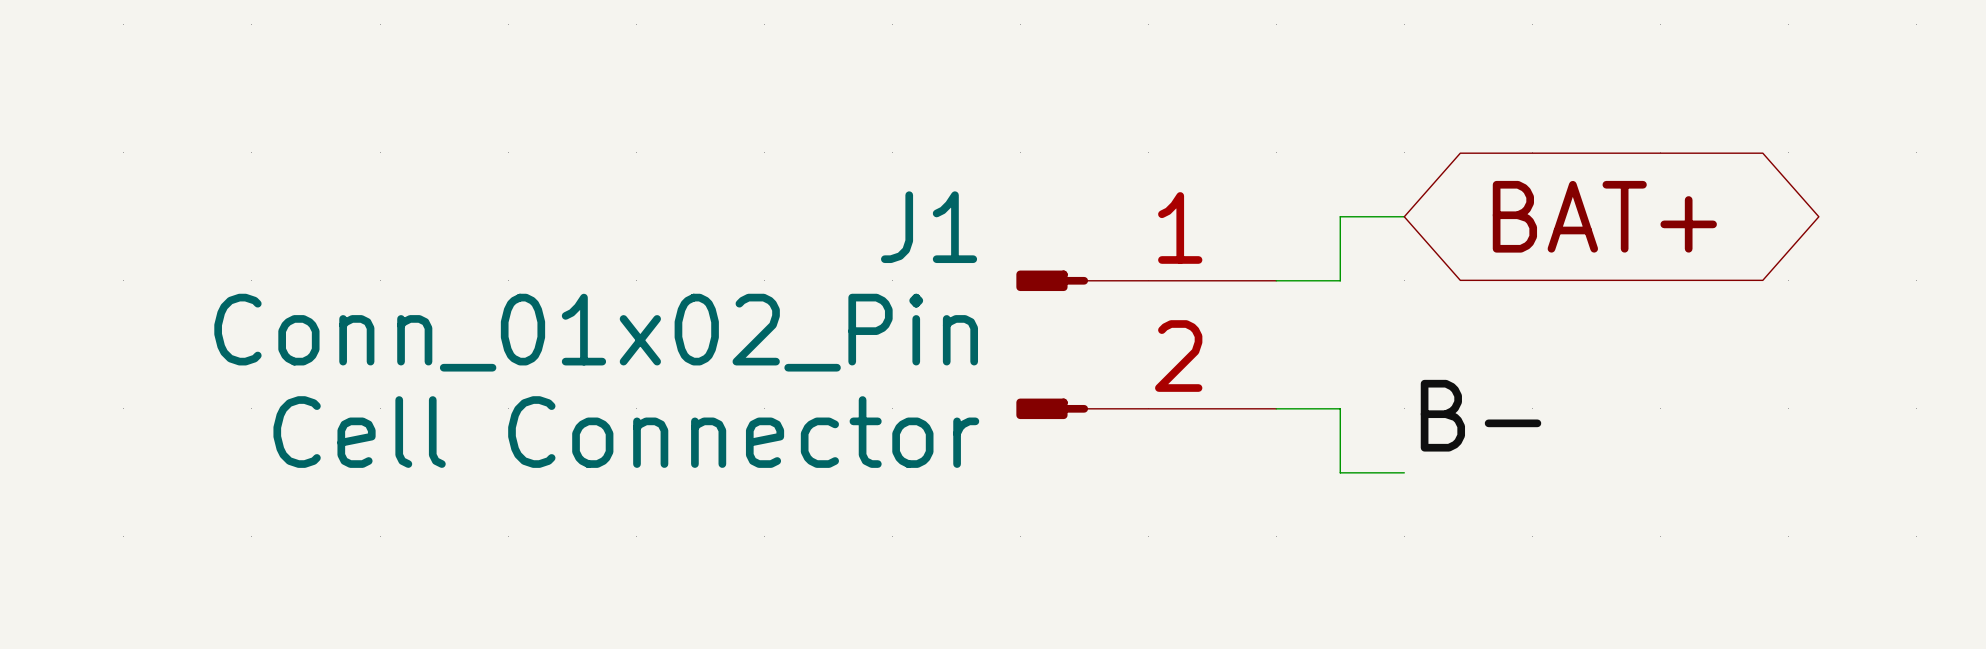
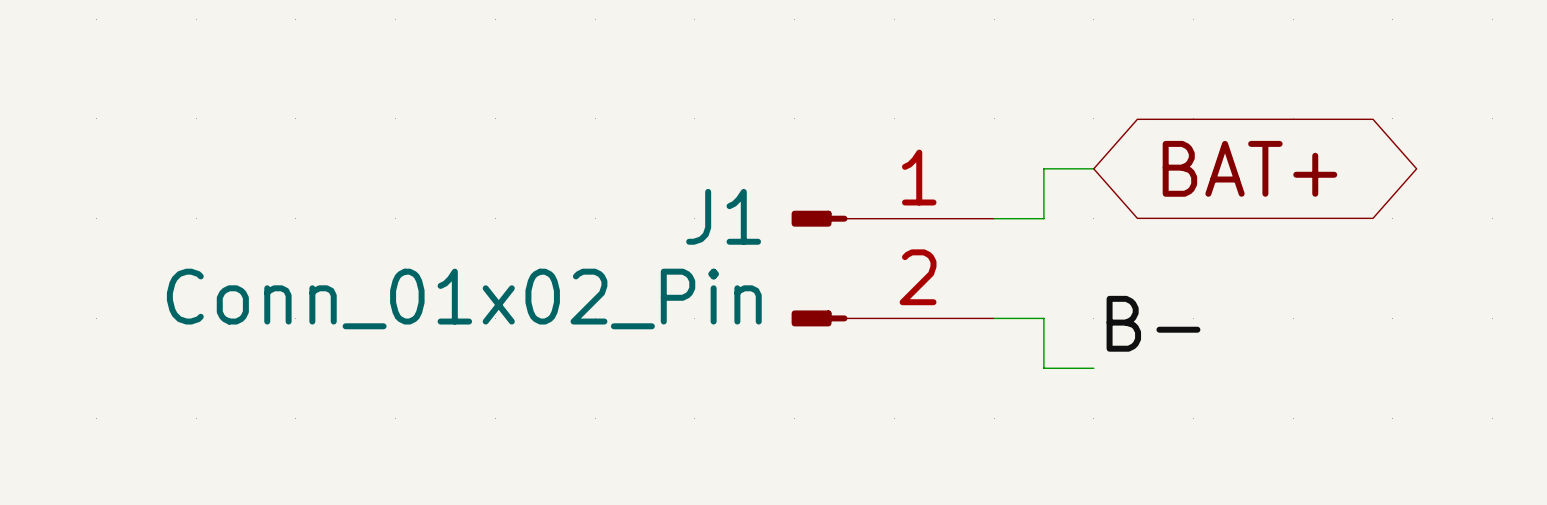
J1 name position: J1 (929, 227) -> J1 (723, 216)
J1 value position: Conn_01x02_Pin (596, 332) -> Conn_01x02_Pin (464, 298)
J1 text: Cell Connector (626, 432) -> none

